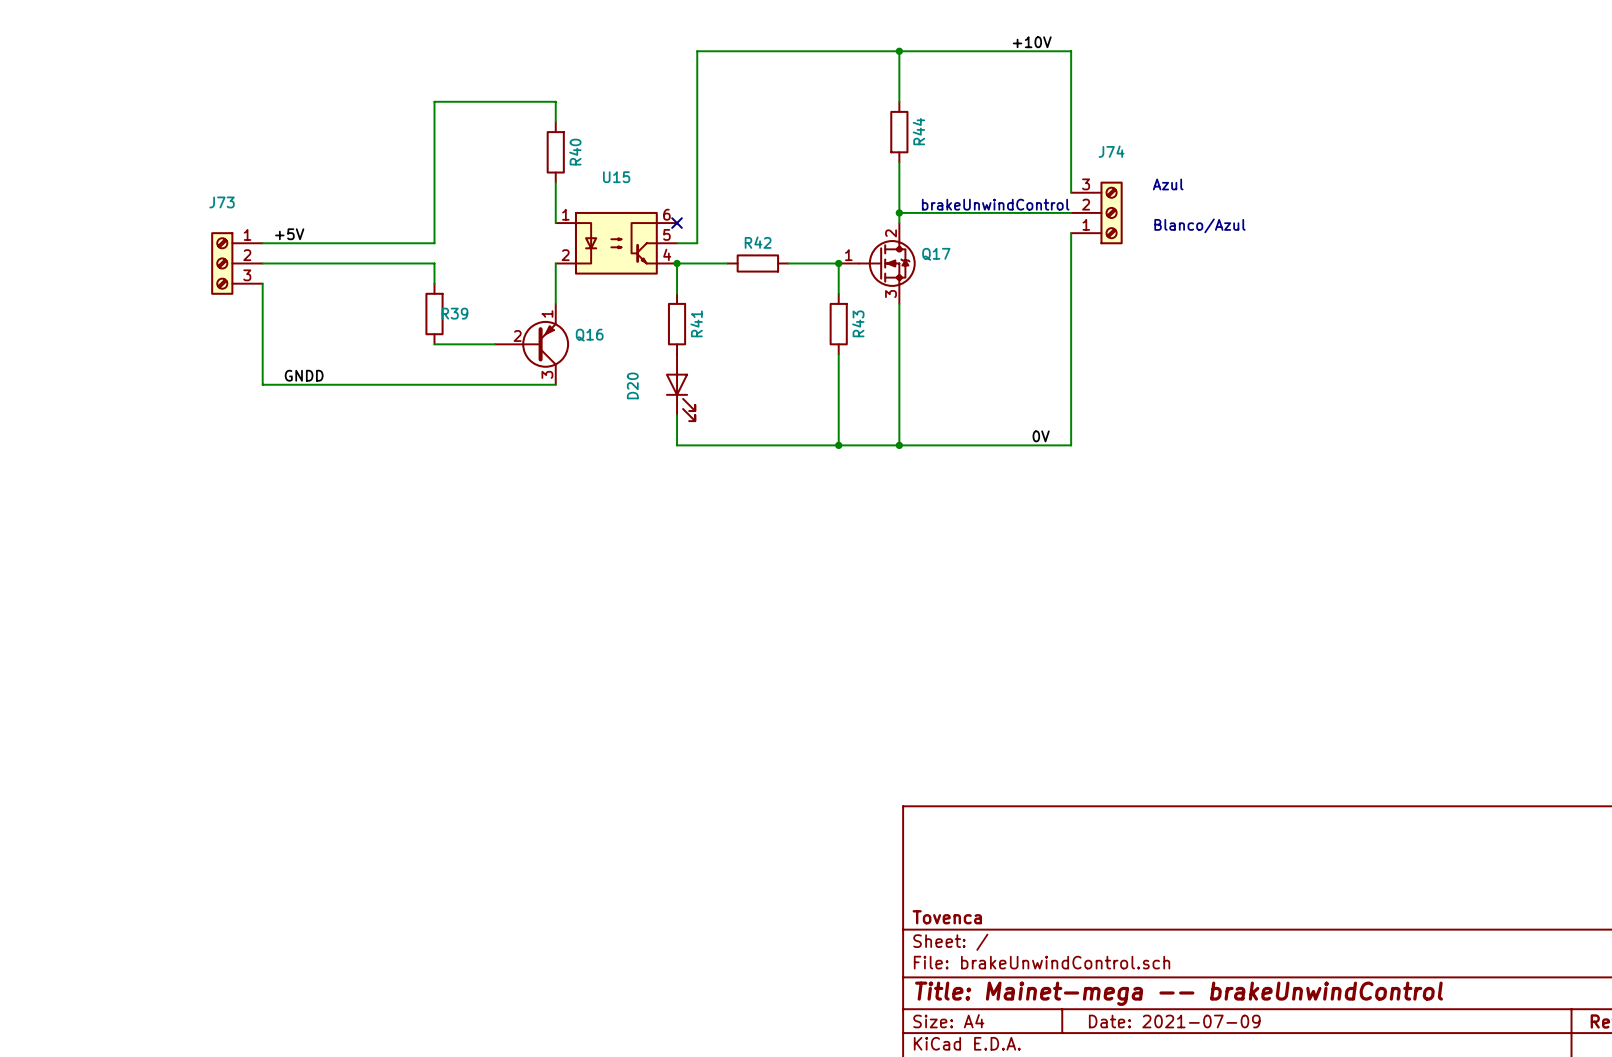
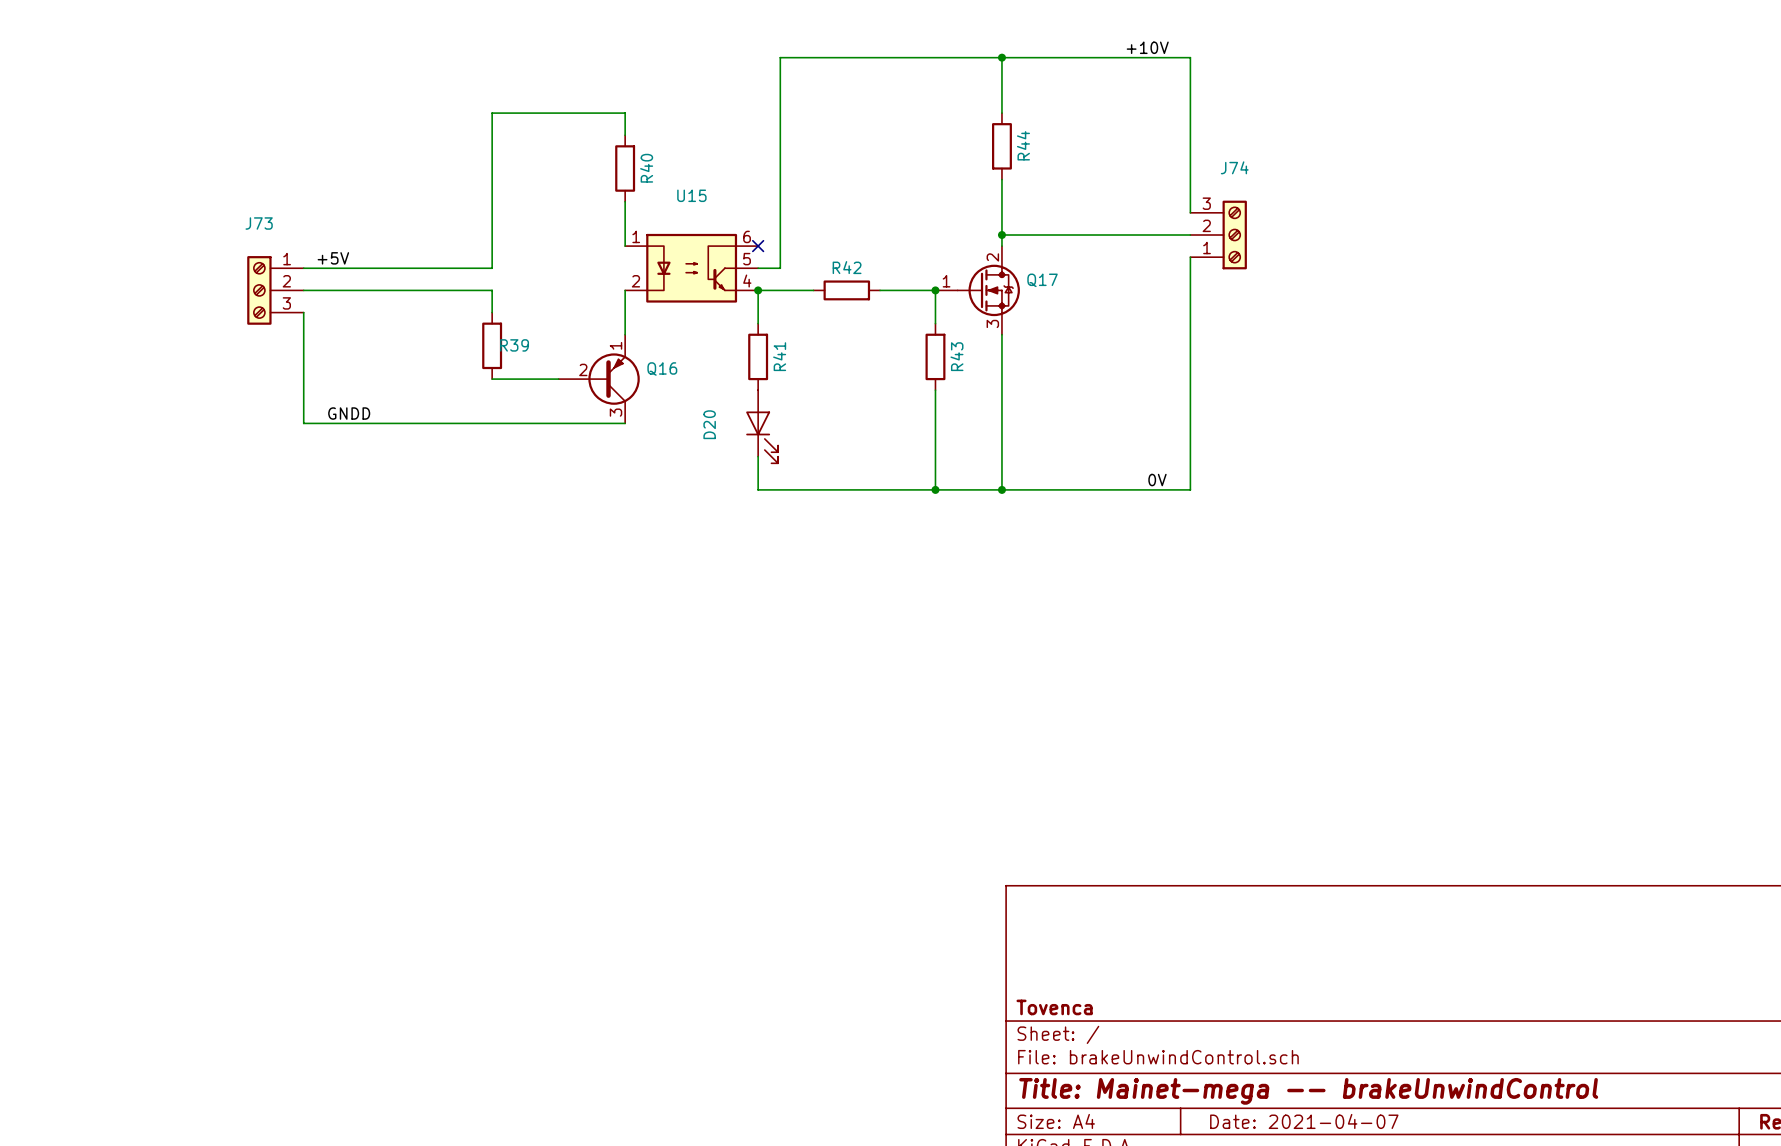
text: Azul (1168, 184) -> none
text: brakeUnwindControl (995, 204) -> none
text: Blanco/Azul (1199, 225) -> none
title block: Date: 2021-07-09 (1174, 1021) -> Date: 2021-04-07 (1304, 1121)

